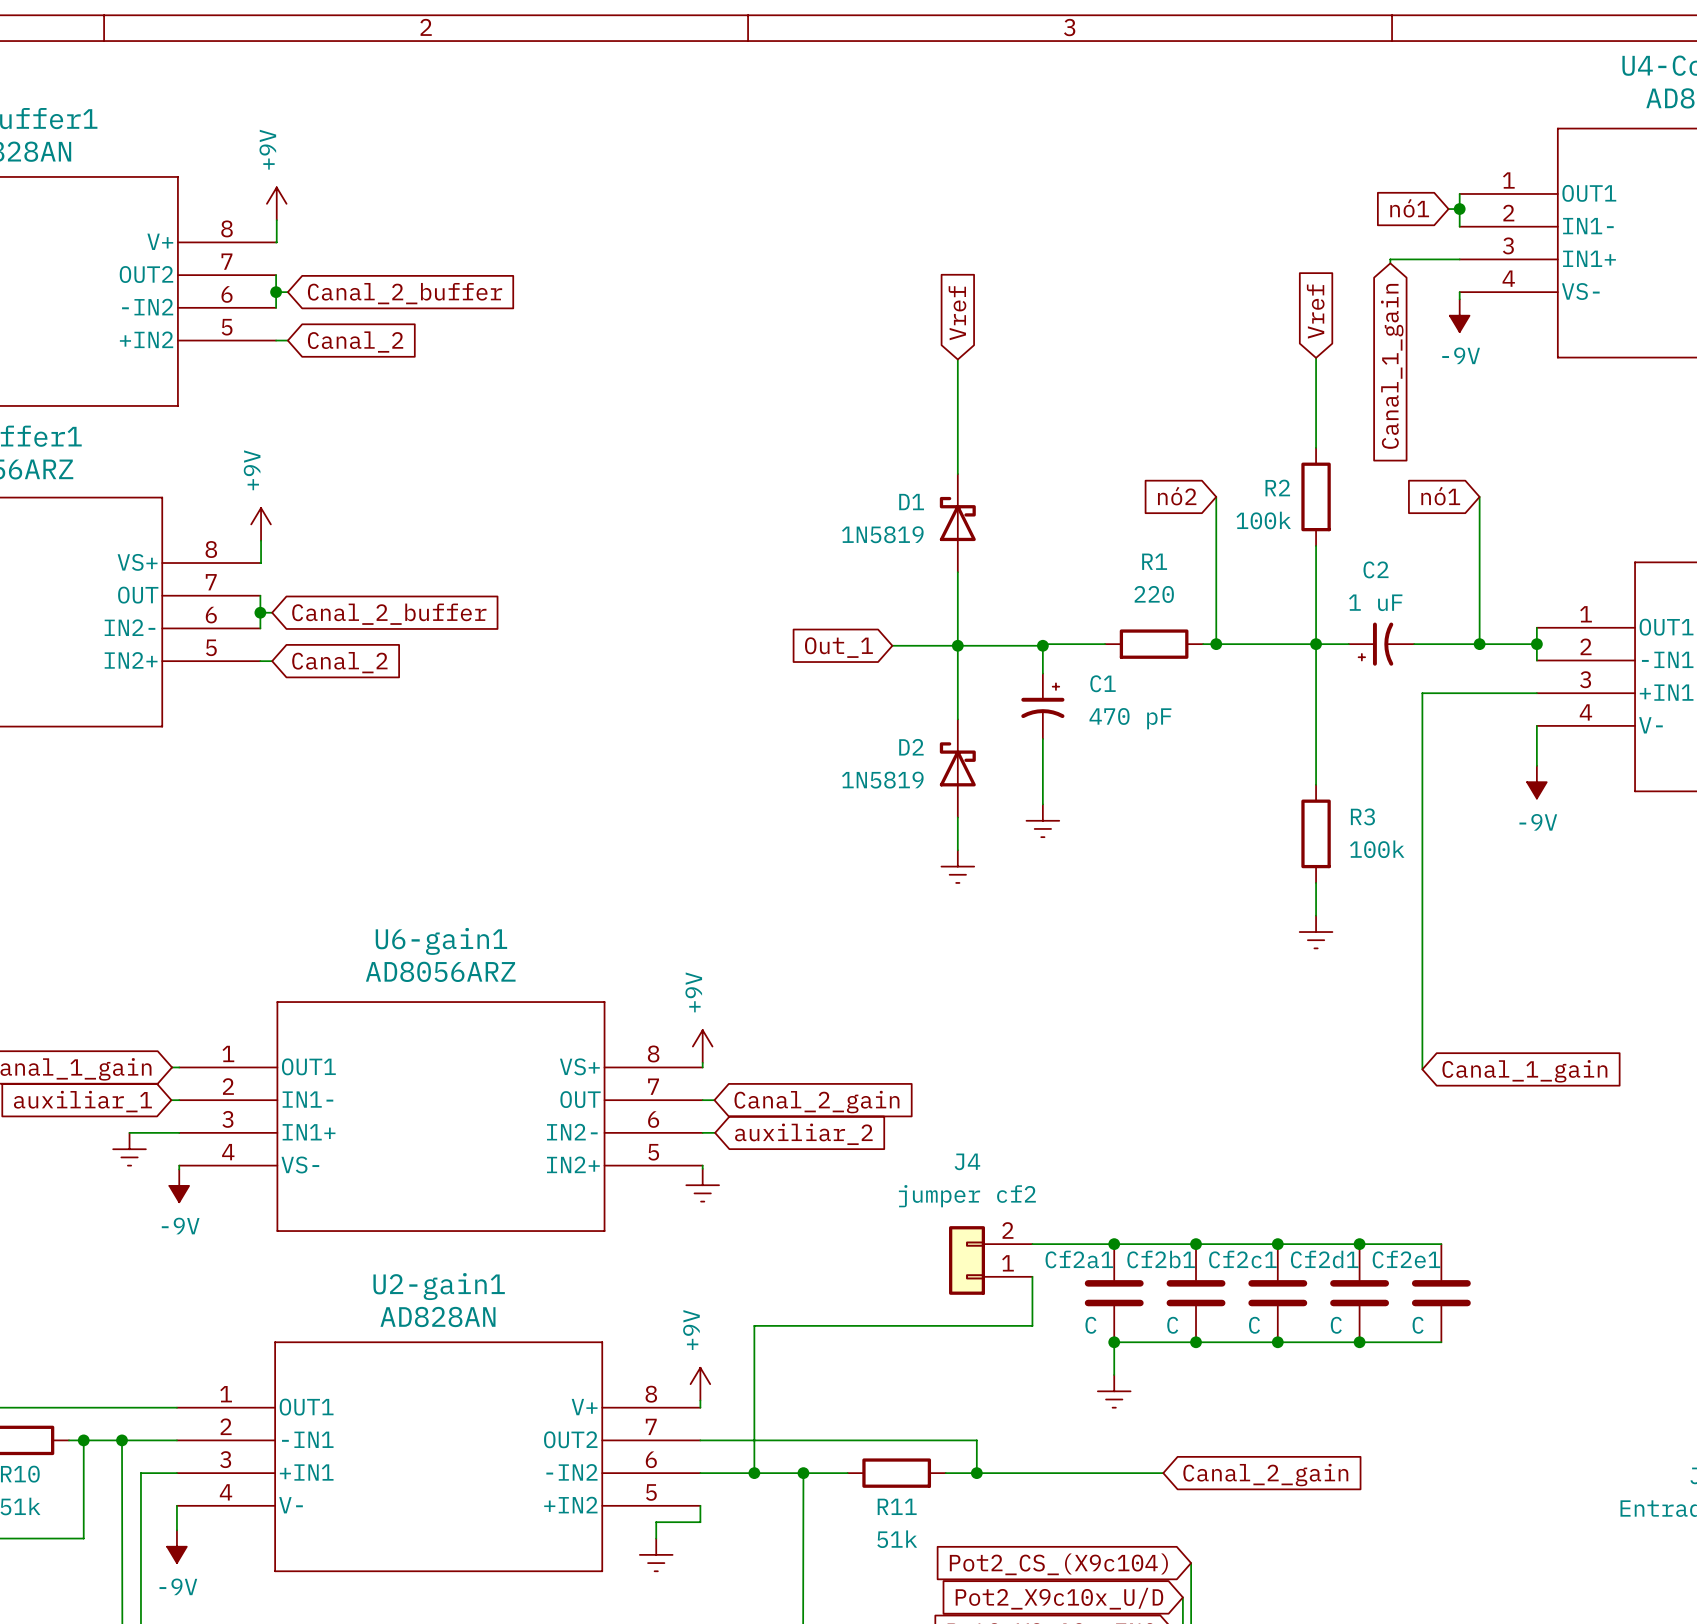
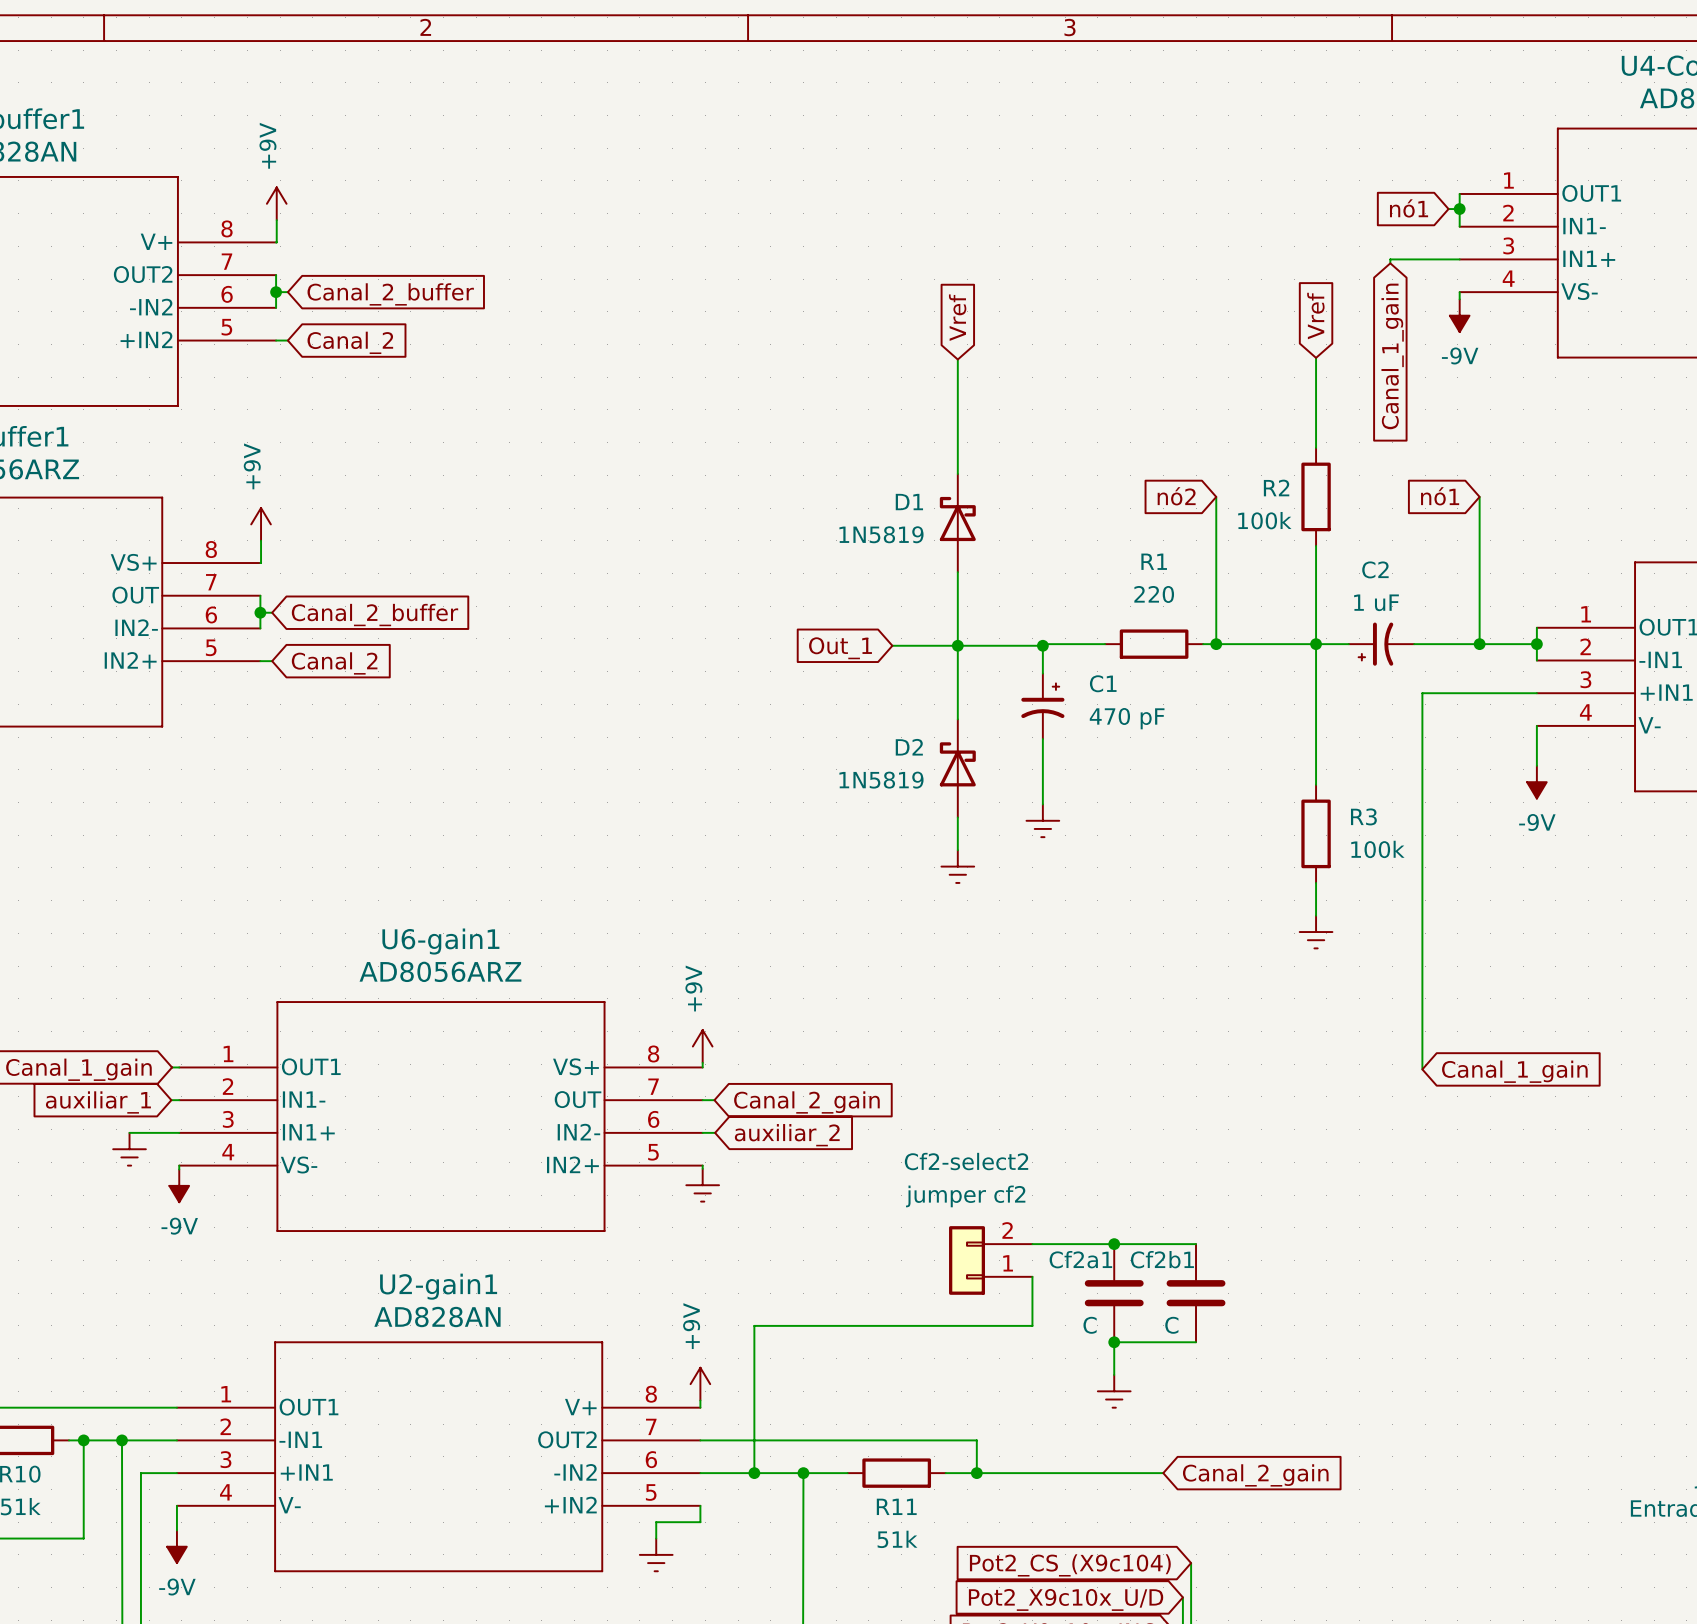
J4 name: J4 (967, 1161) -> Cf2-select2 (966, 1161)
wire: (1196, 1244) (1441, 1244) -> none
junction: (1196, 1244) -> none
junction: (1277, 1244) -> none
junction: (1359, 1244) -> none
Cf2c1: C (1277, 1293) -> none
Cf2d1: C (1359, 1293) -> none
Cf2e1: C (1441, 1293) -> none
wire: (1196, 1342) (1441, 1342) -> none
junction: (1196, 1342) -> none
junction: (1277, 1342) -> none
junction: (1359, 1342) -> none

